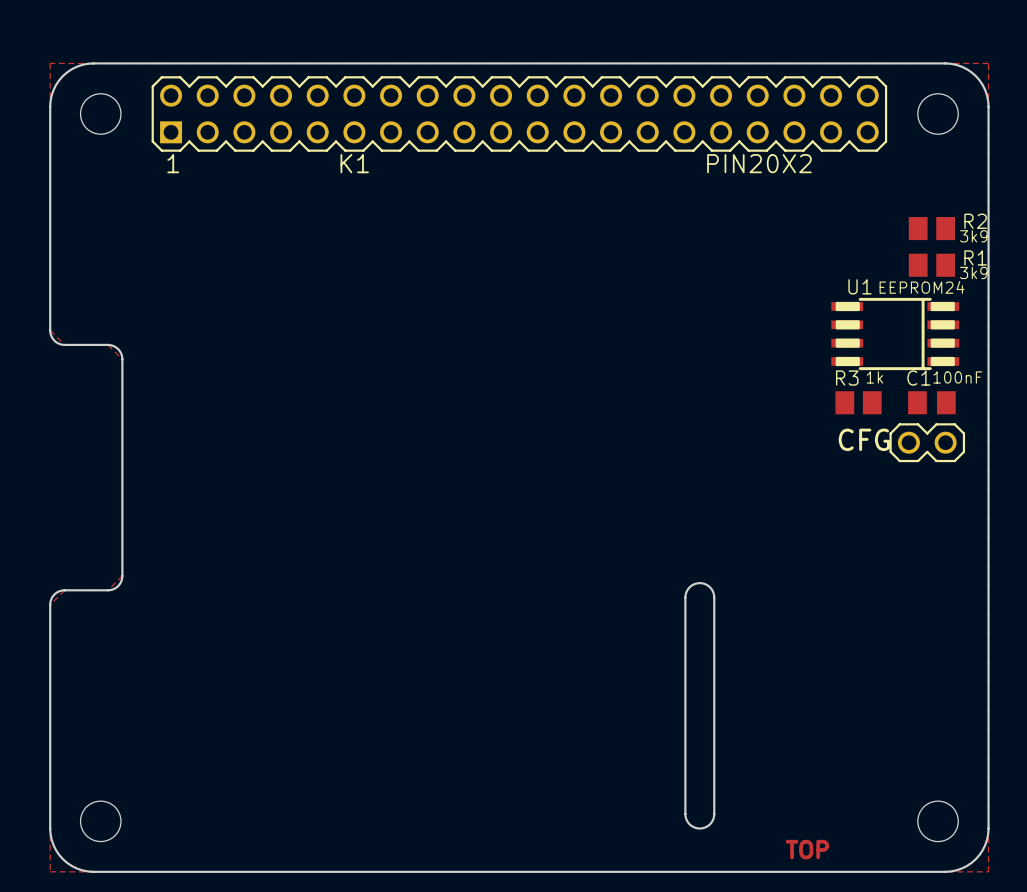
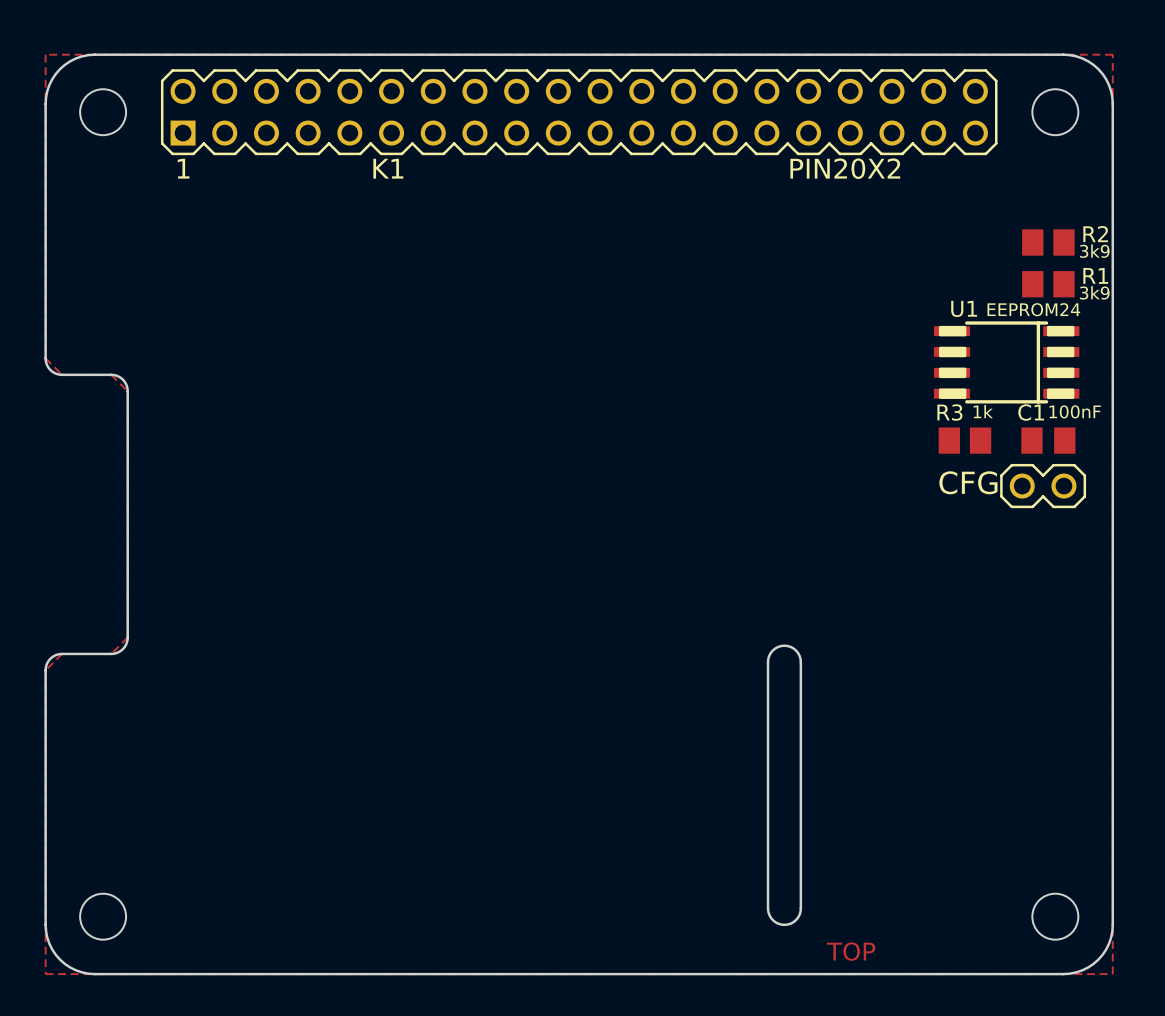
text position: TOP (807, 849) -> TOP (851, 951)

